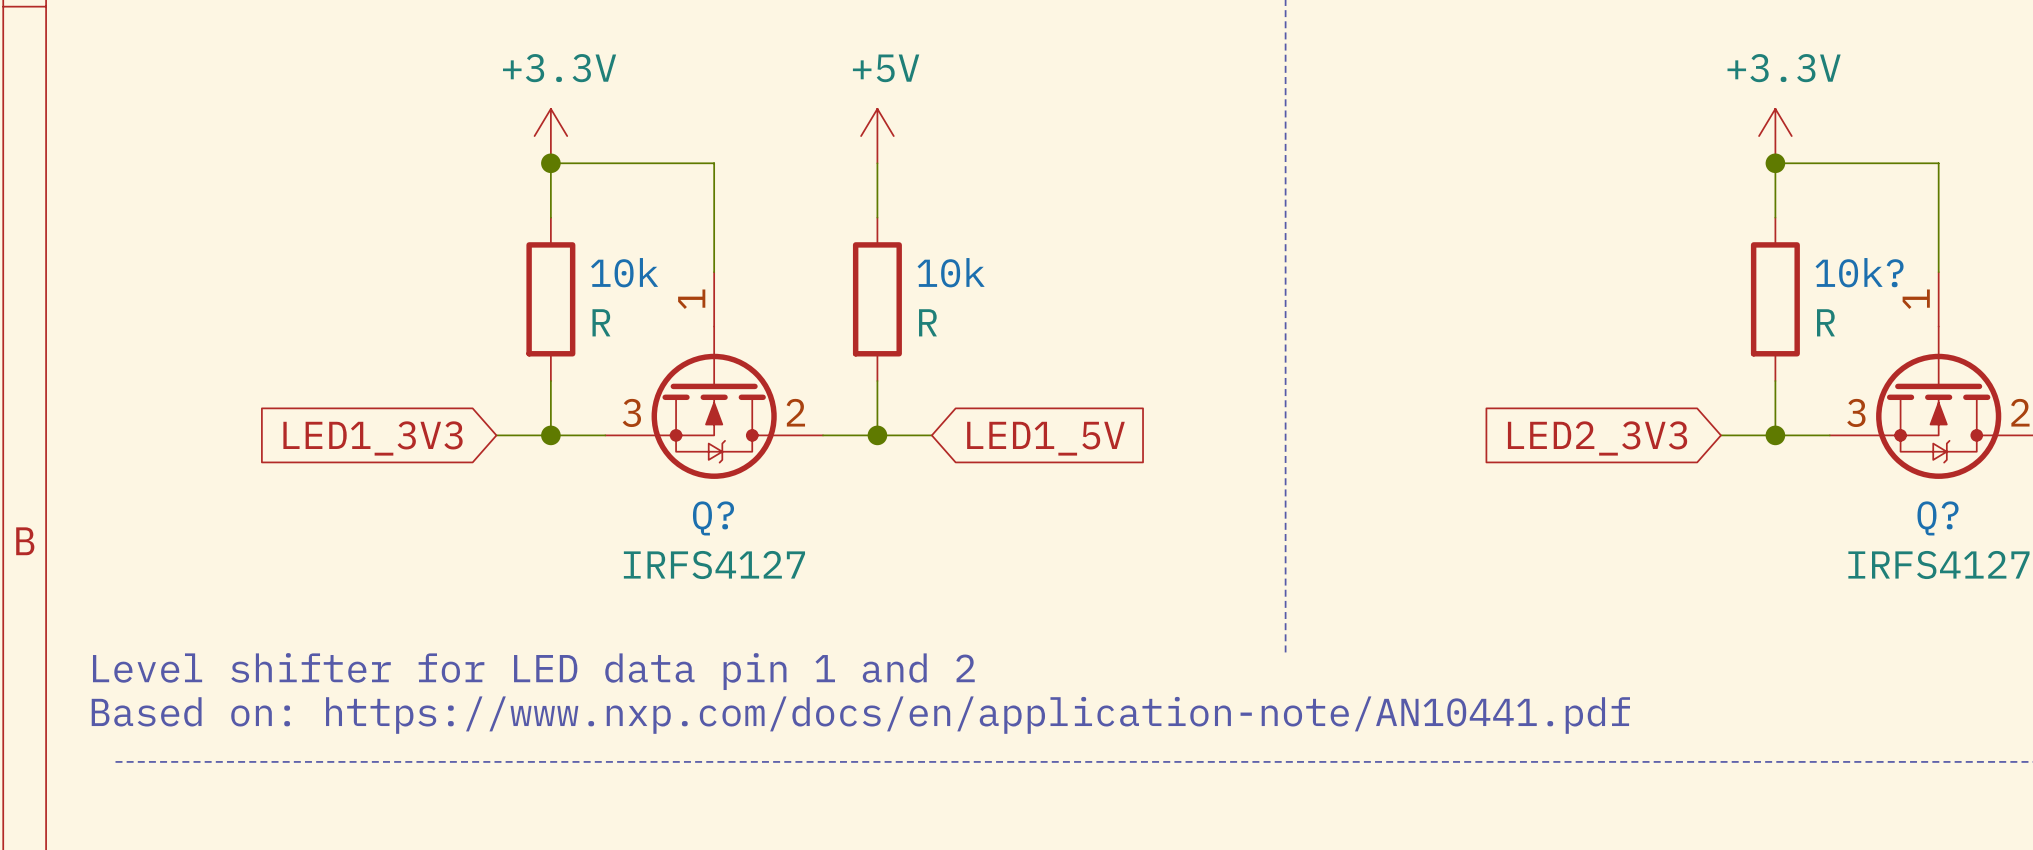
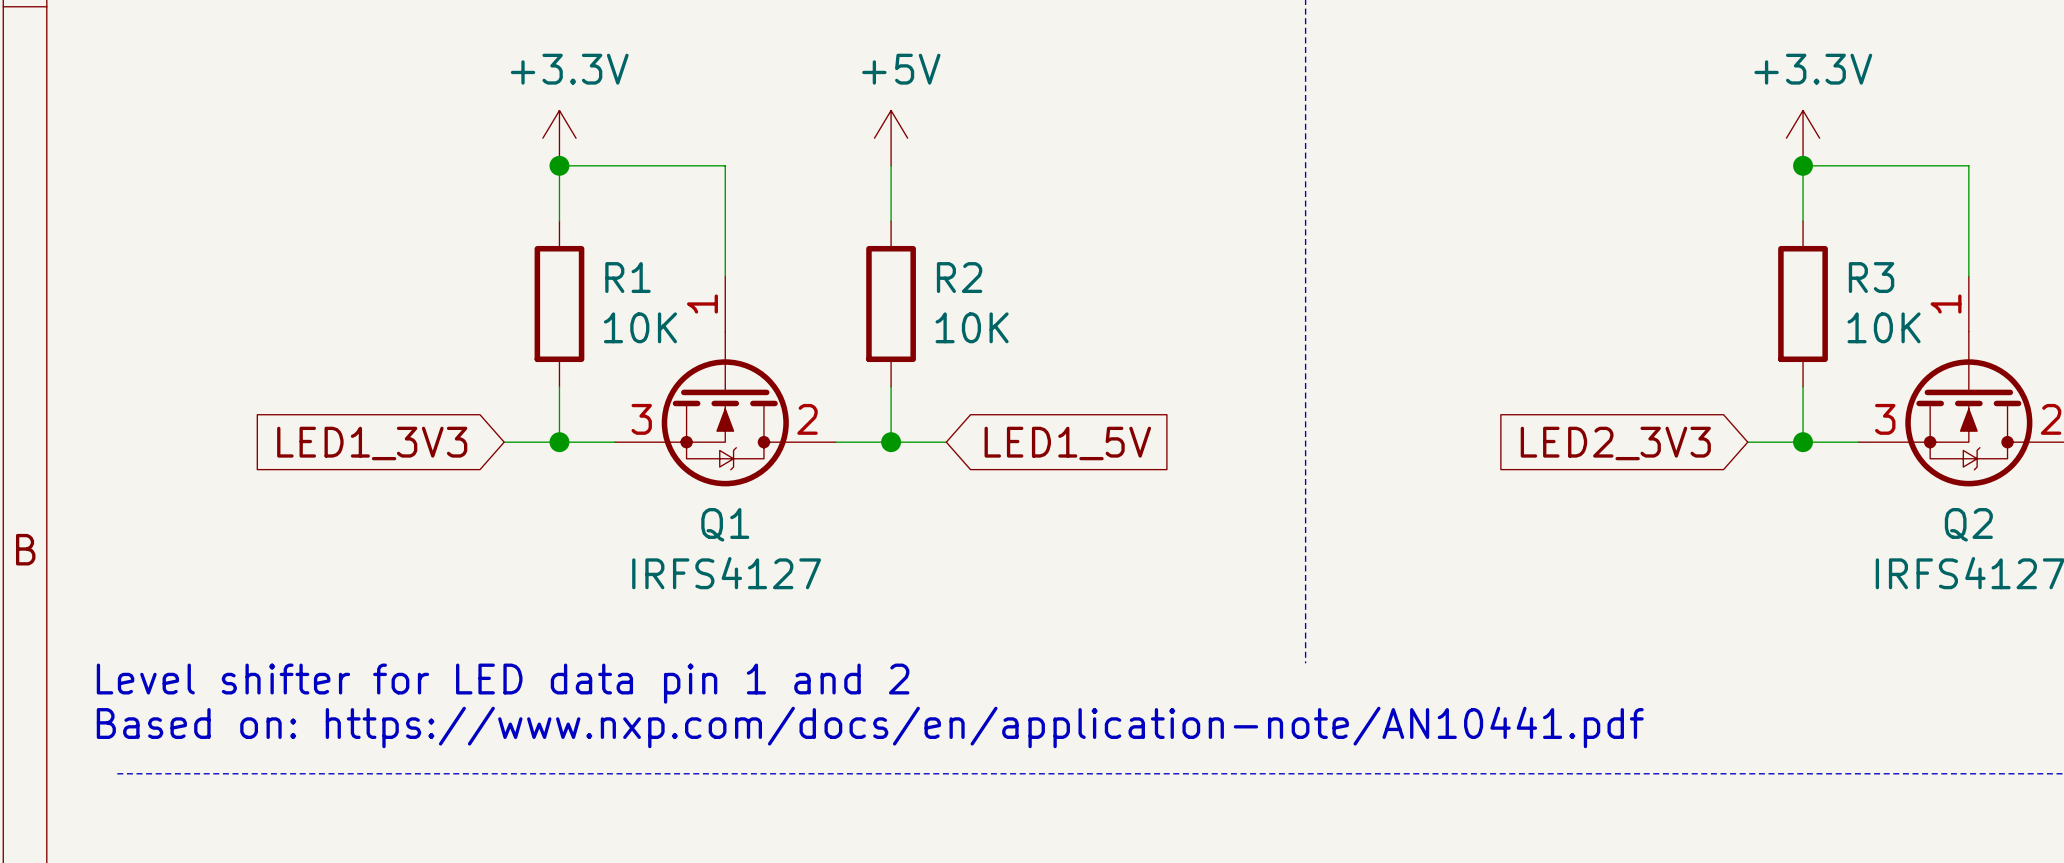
10k name: 10k (624, 272) -> R1 (627, 277)
10k name: 10k (951, 272) -> R2 (959, 277)
10k? name: 10k? (1859, 272) -> R3 (1871, 277)
10k value: R (601, 322) -> 10K (640, 327)
10k value: R (927, 322) -> 10K (972, 327)
10k? value: R (1825, 322) -> 10K (1884, 327)
Q? name: Q? (713, 518) -> Q1 (725, 524)
Q? name: Q? (1938, 518) -> Q2 (1968, 524)

